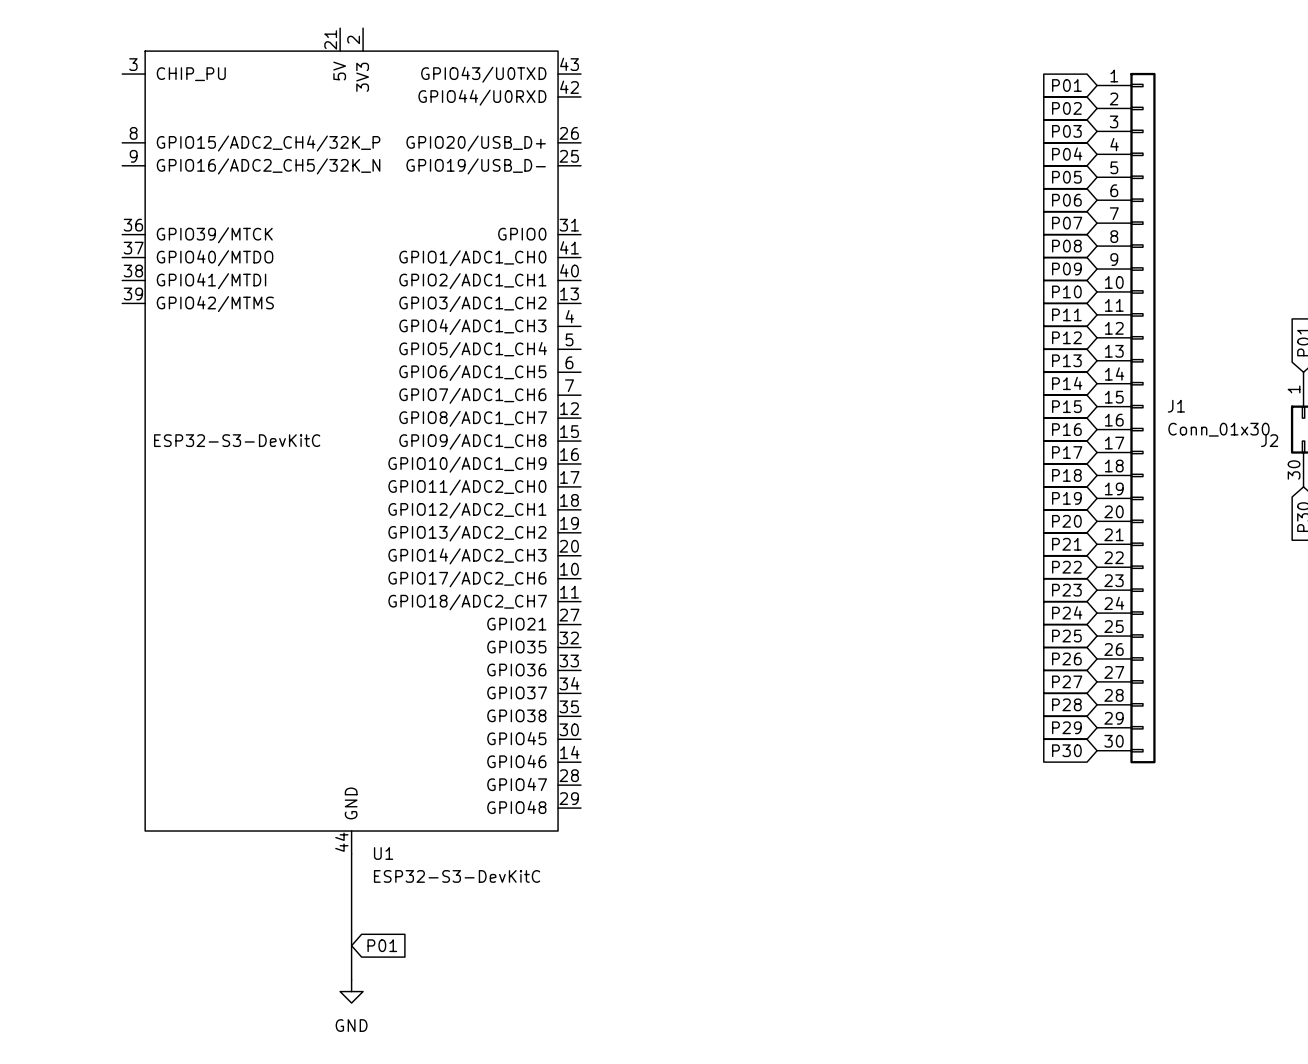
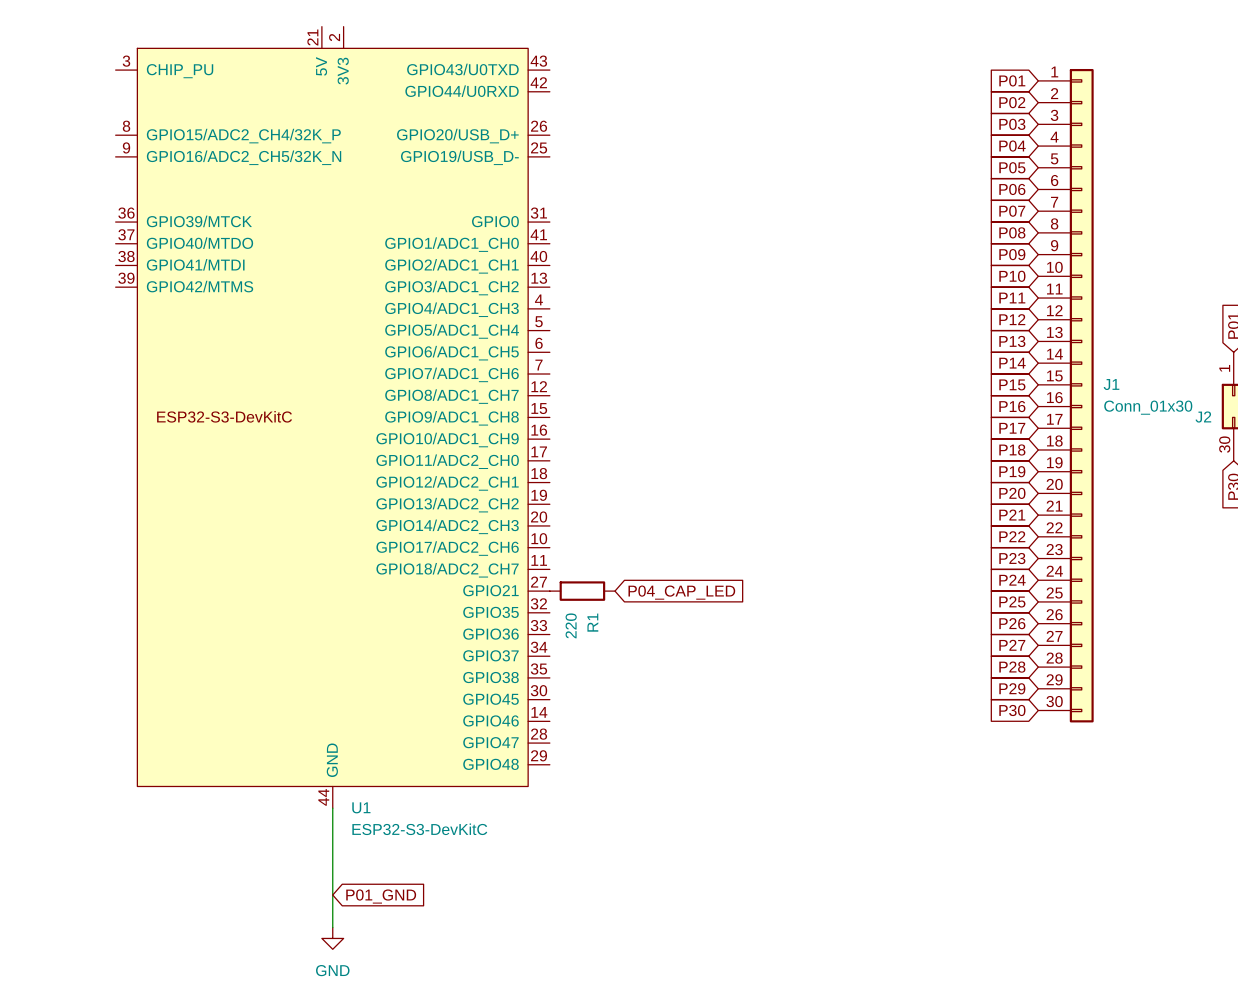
R1: none -> 220 (582, 591)
global label: none -> P04_CAP_LED (681, 592)
global label: P01 (382, 945) -> P01_GND (381, 896)

